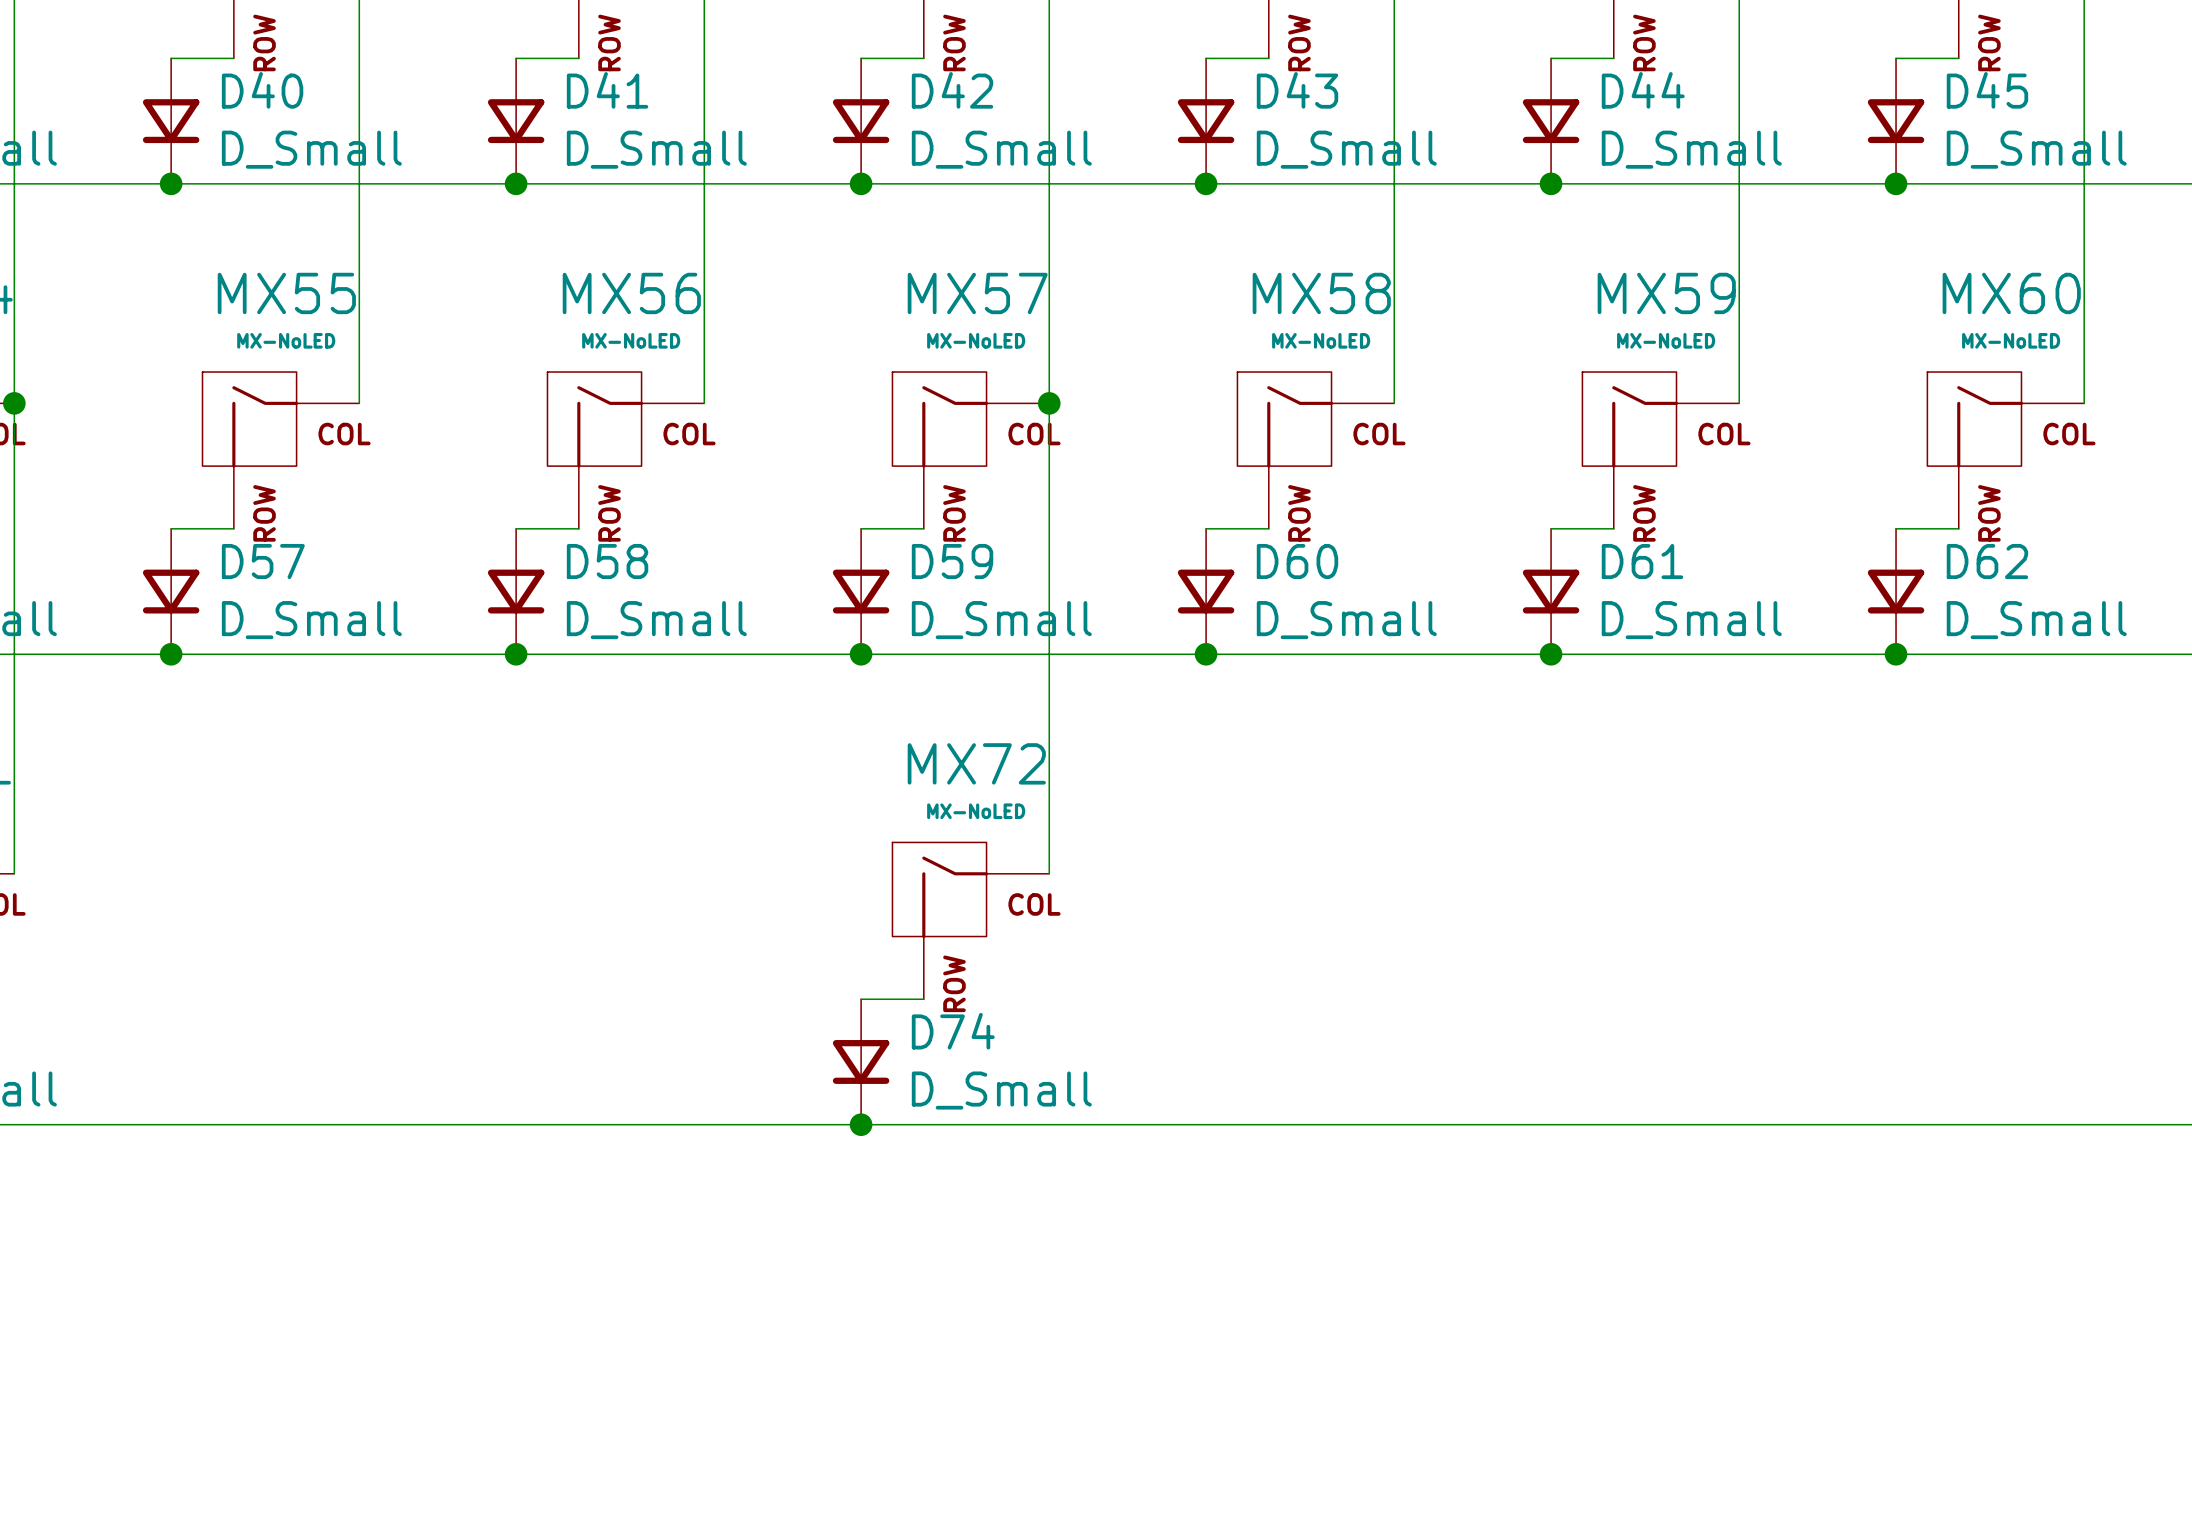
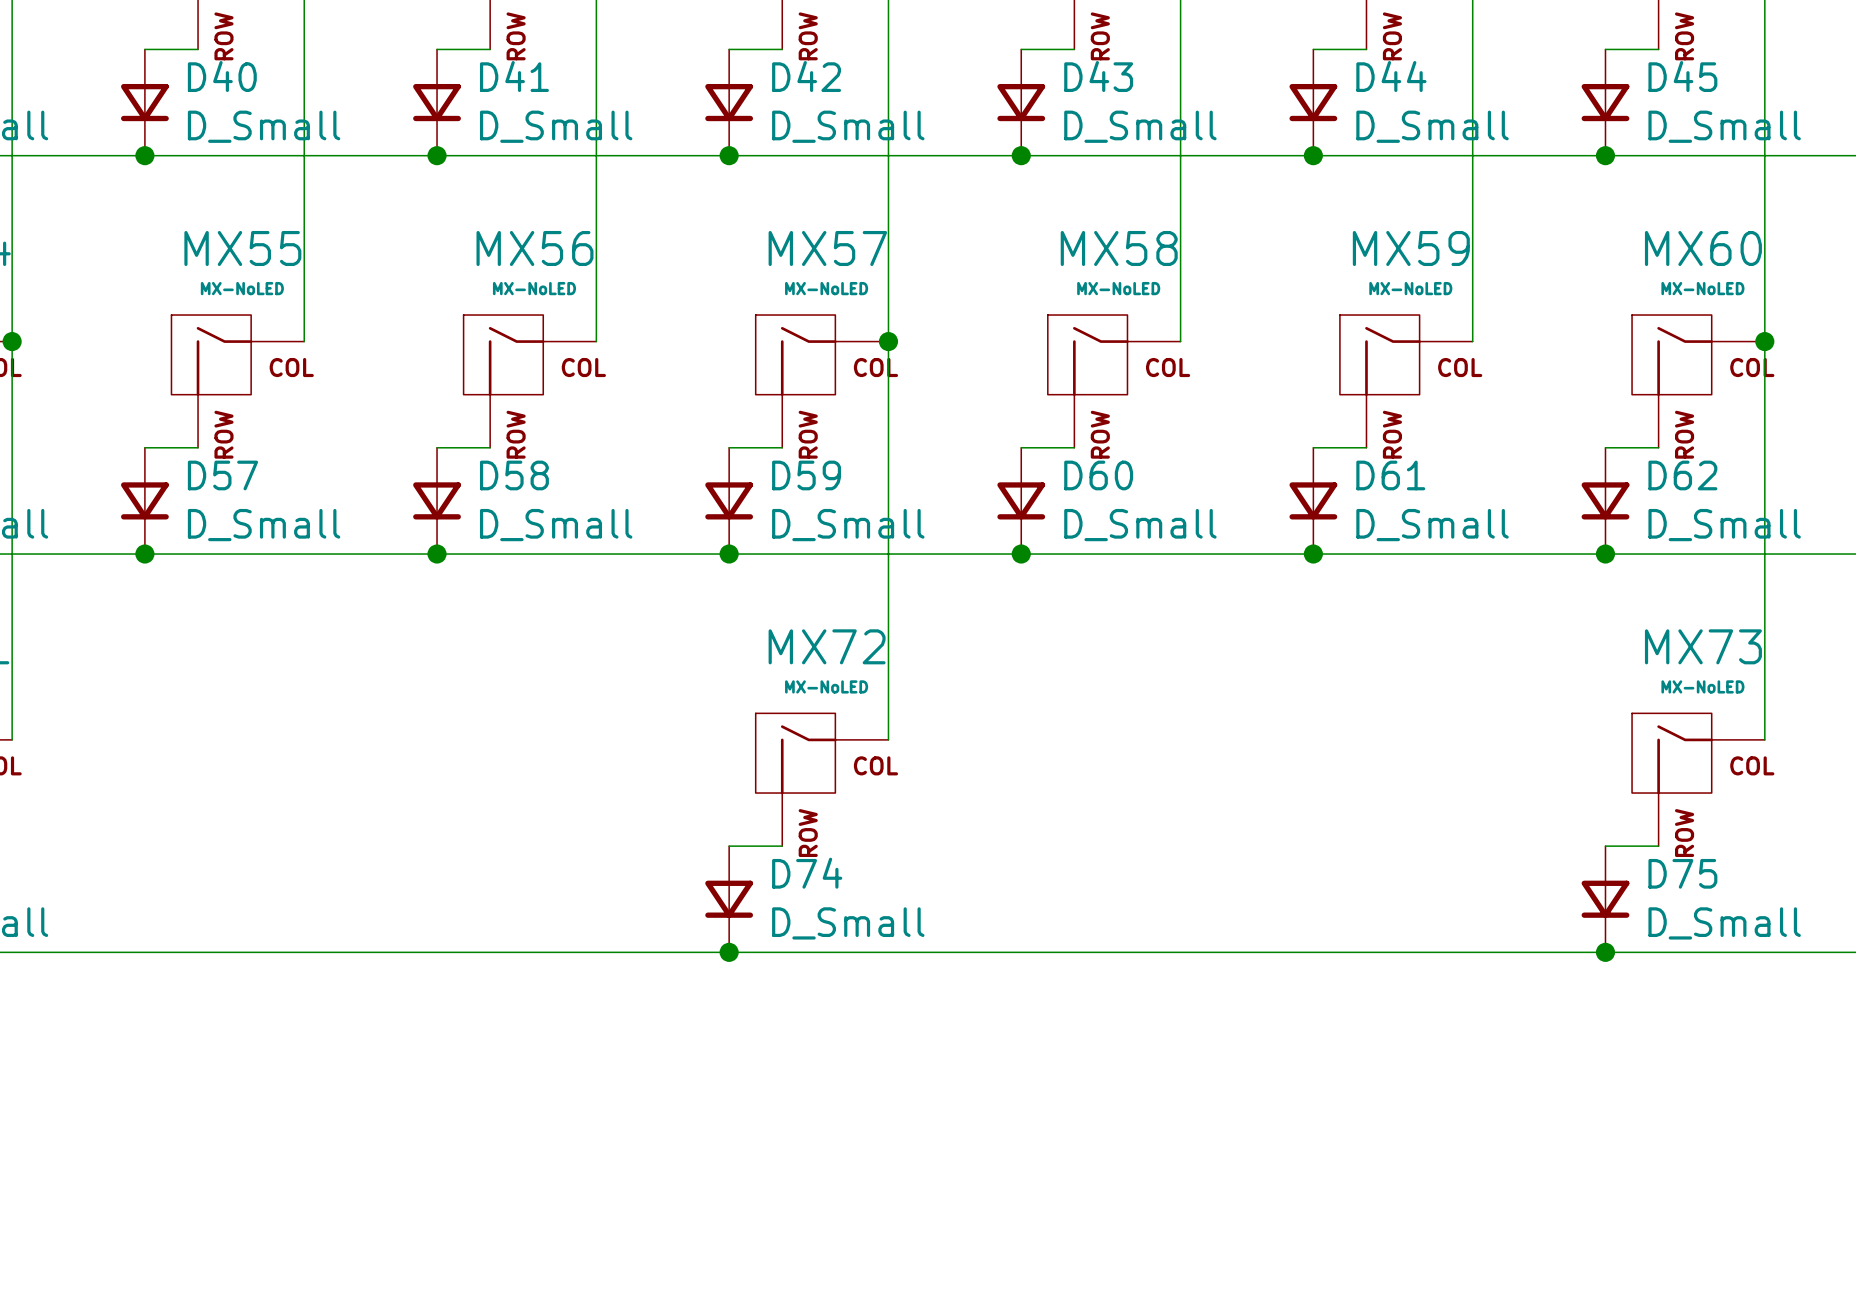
wire: none -> (1764, 341) (1764, 739)
junction: none -> (1764, 341)
MX73: none -> MX-NoLED (1698, 779)
wire: none -> (1605, 846) (1658, 846)
D75: none -> D_Small (1605, 899)
junction: none -> (1605, 952)

